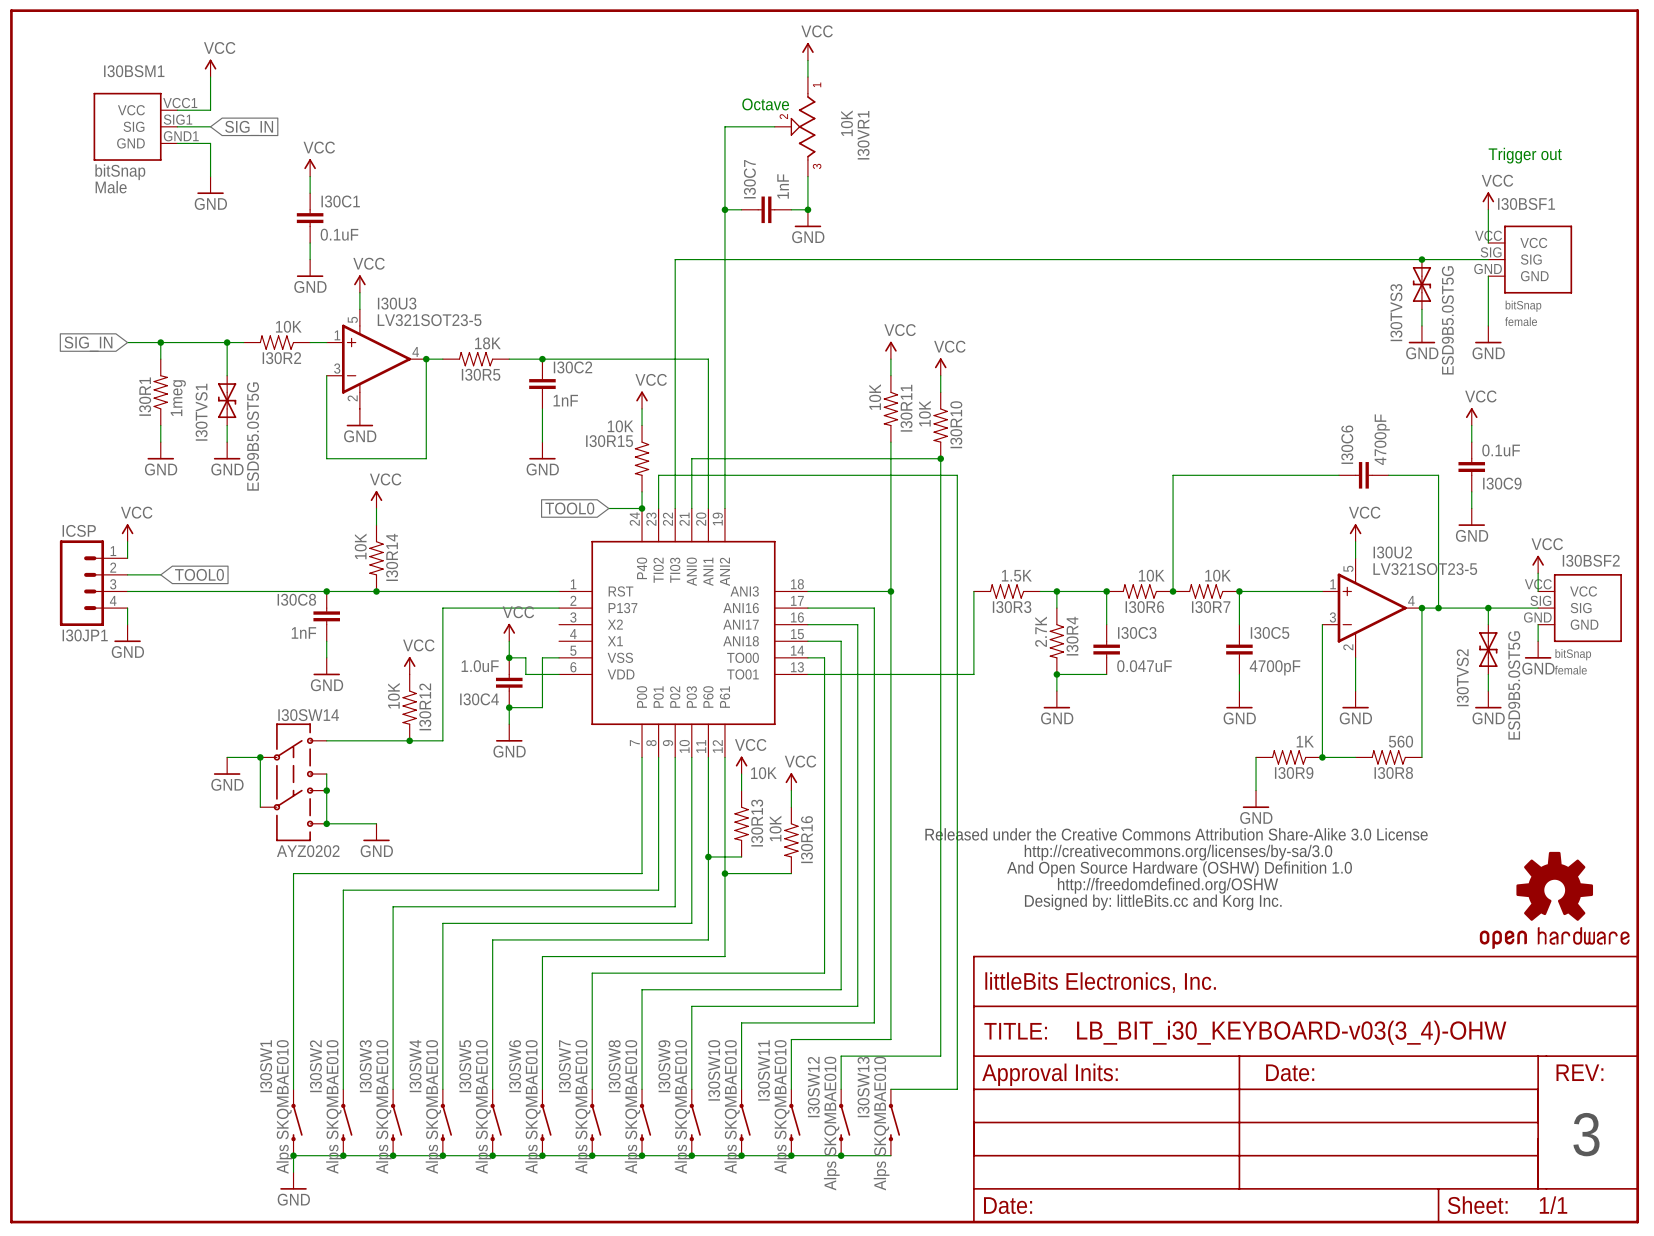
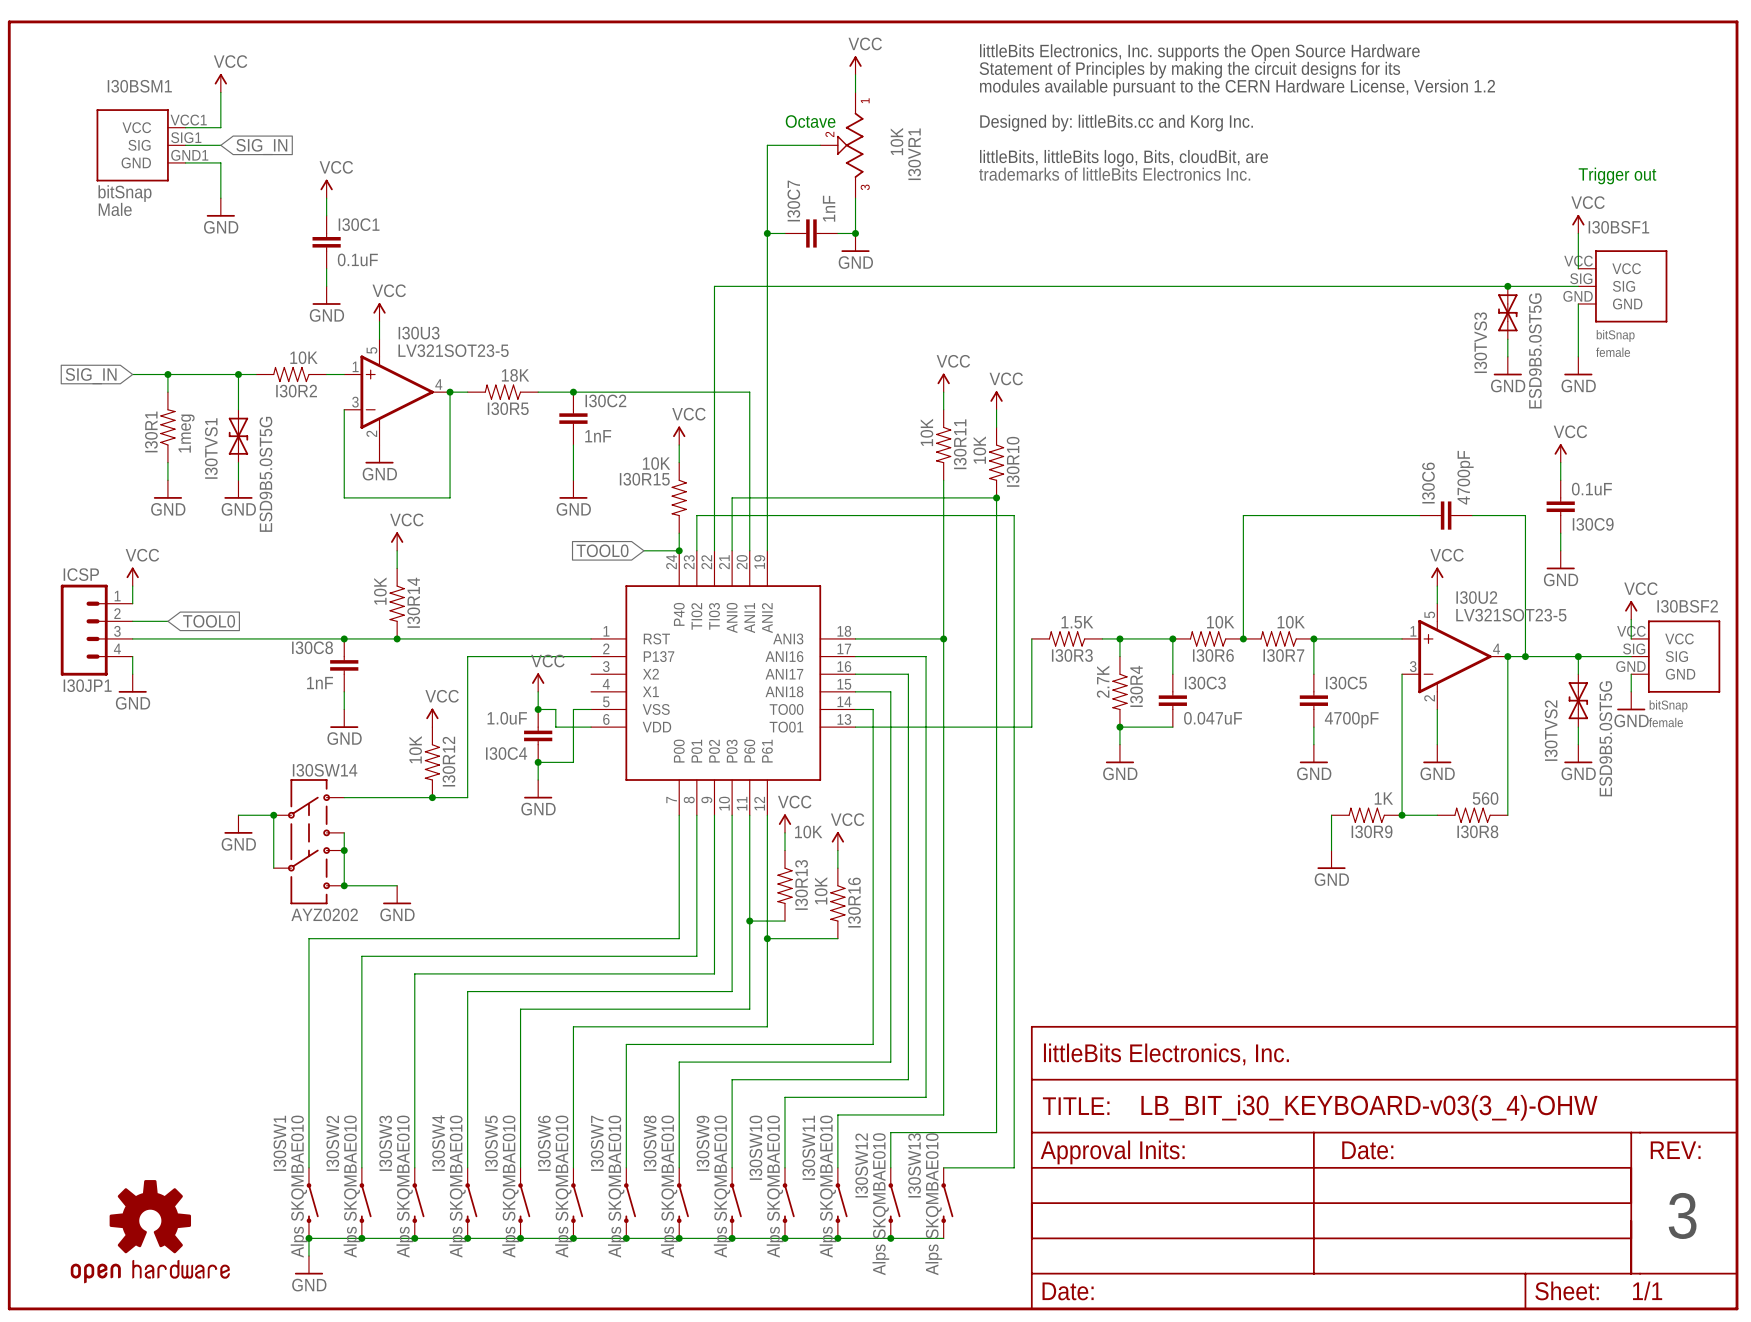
part: none -> (1237, 112)
part: (1176, 869) -> none
part: (1554, 900) -> none
part: none -> (150, 1231)

